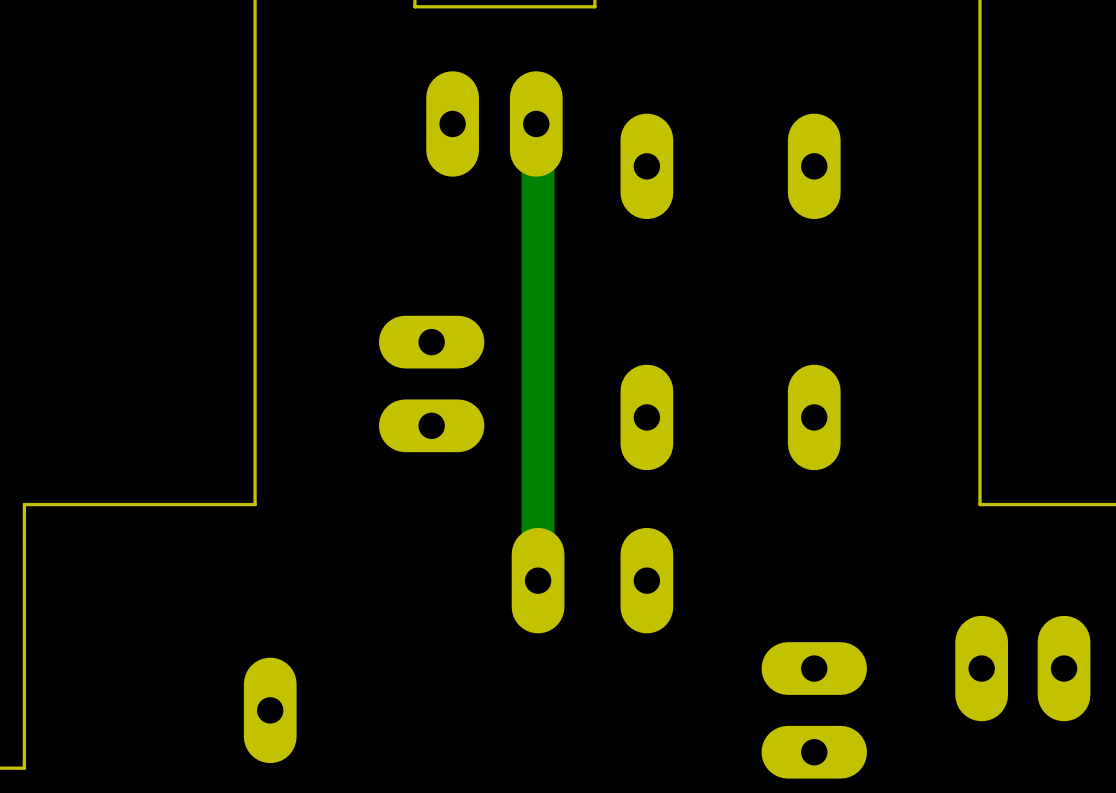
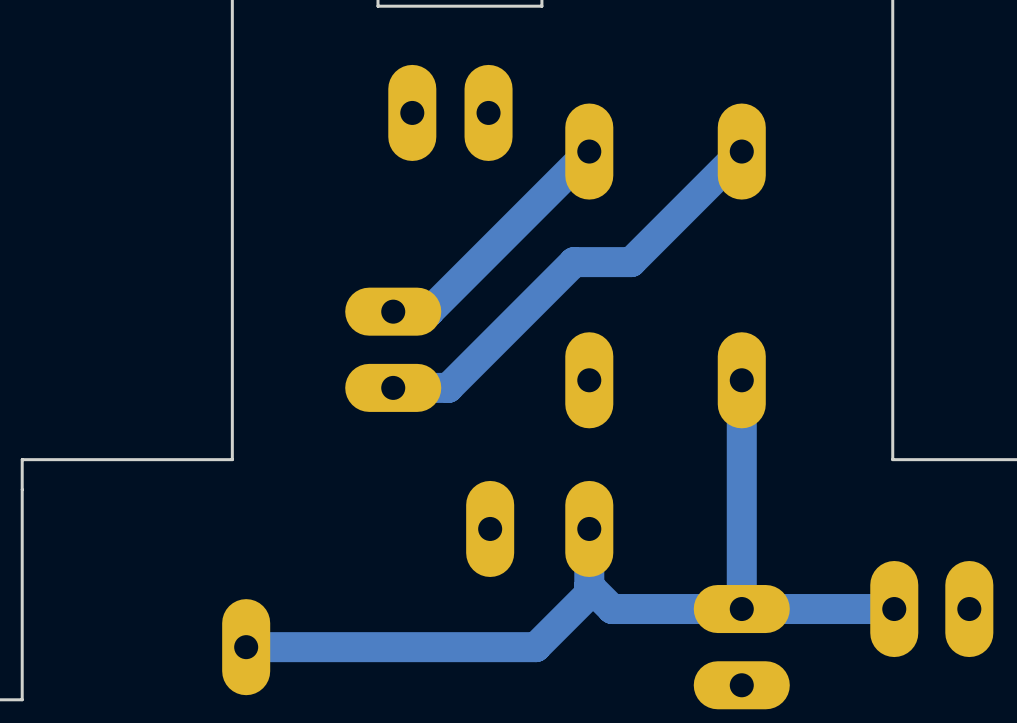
track: (536, 123) (538, 125) (538, 580) -> none
track: none -> (589, 151) (429, 311) (393, 311)
track: none -> (741, 151) (631, 262) (574, 262) (448, 387) (393, 387)
track: none -> (741, 380) (741, 609)
track: none -> (589, 528) (589, 593) (535, 647) (246, 647)
track: none -> (589, 586) (612, 609) (894, 609)

